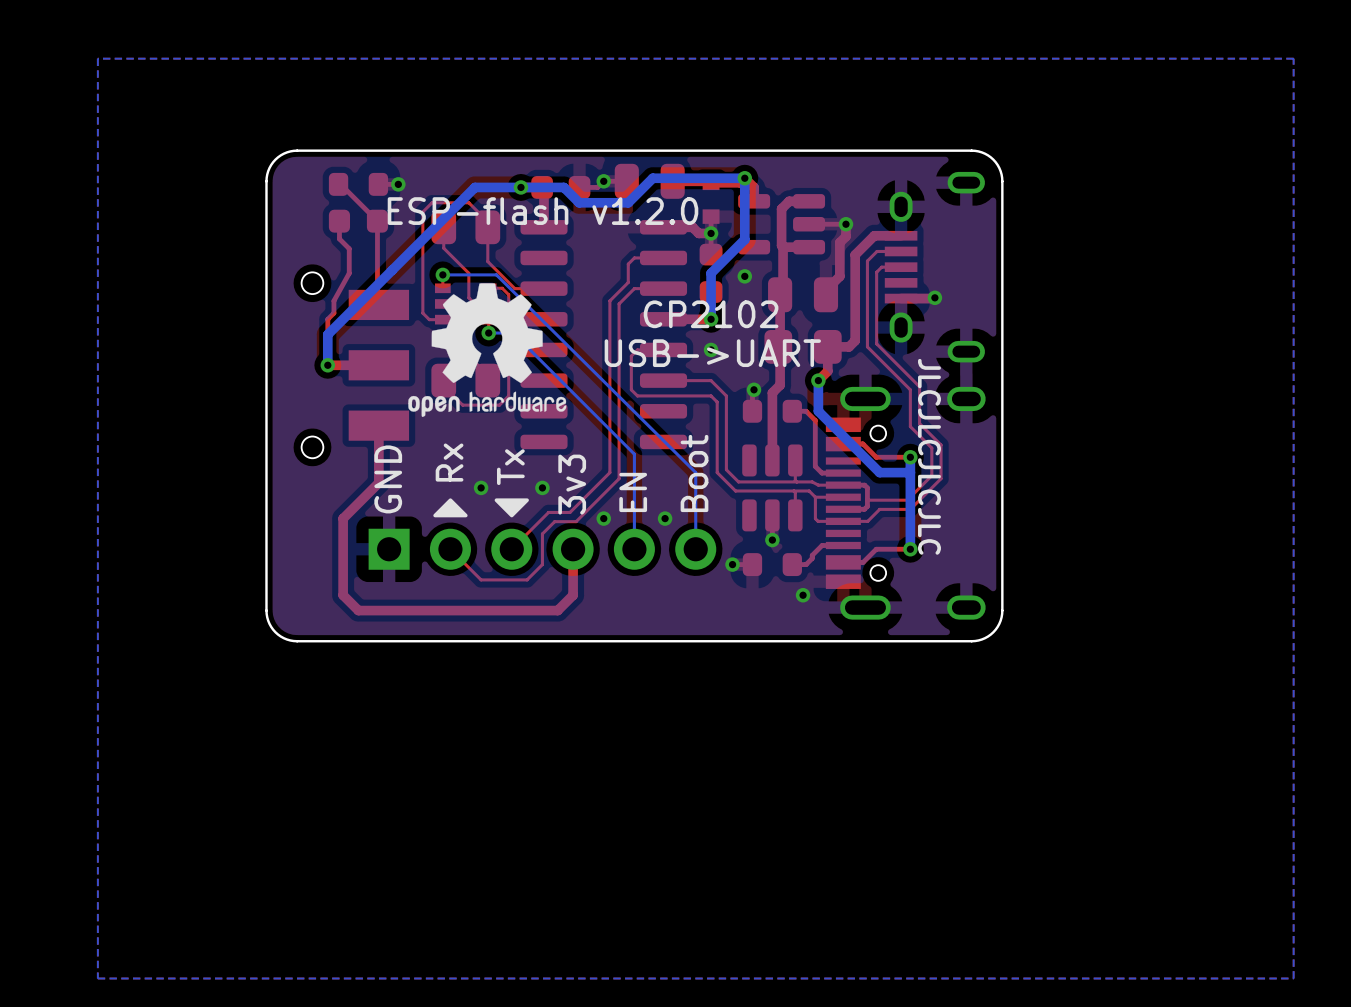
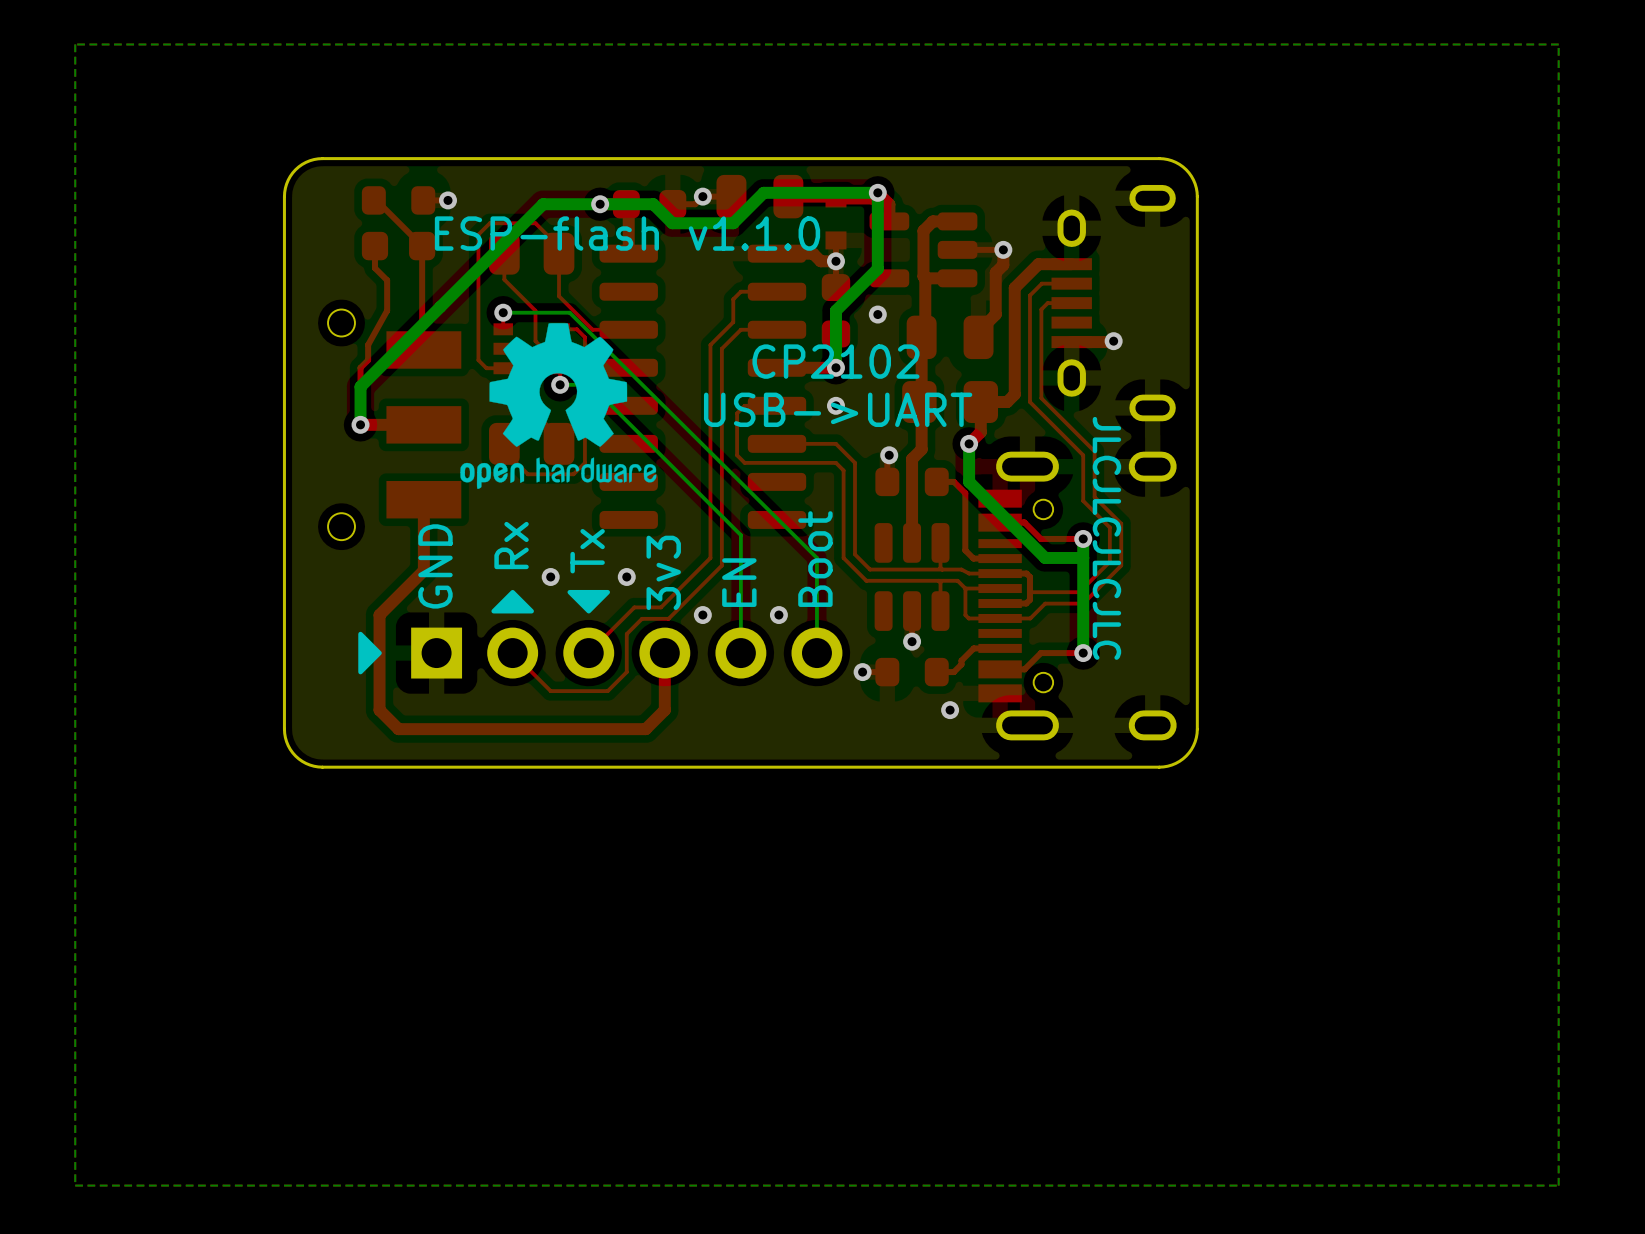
text: ESP-flash v1.2.0 (543, 211) -> ESP-flash v1.1.0 (627, 233)
drawing: none -> [358, 631, 382, 675]

